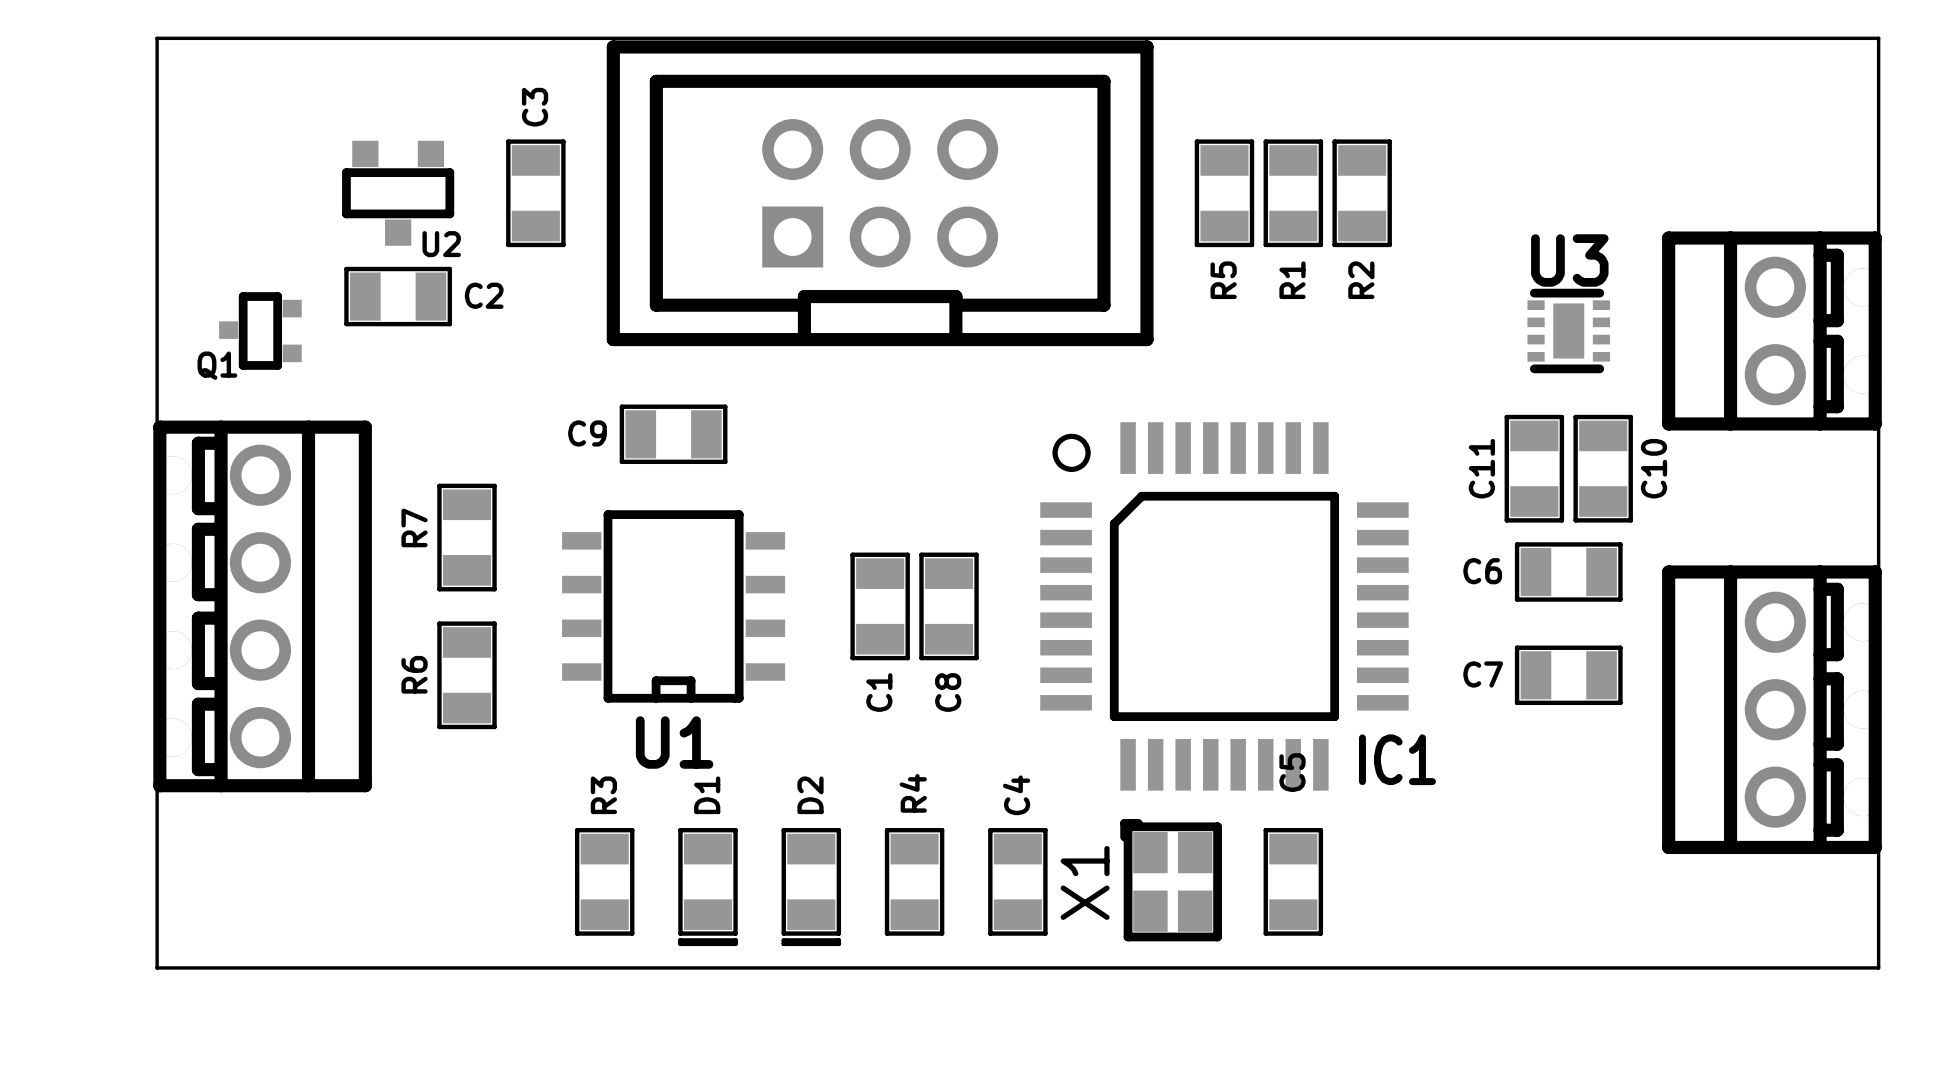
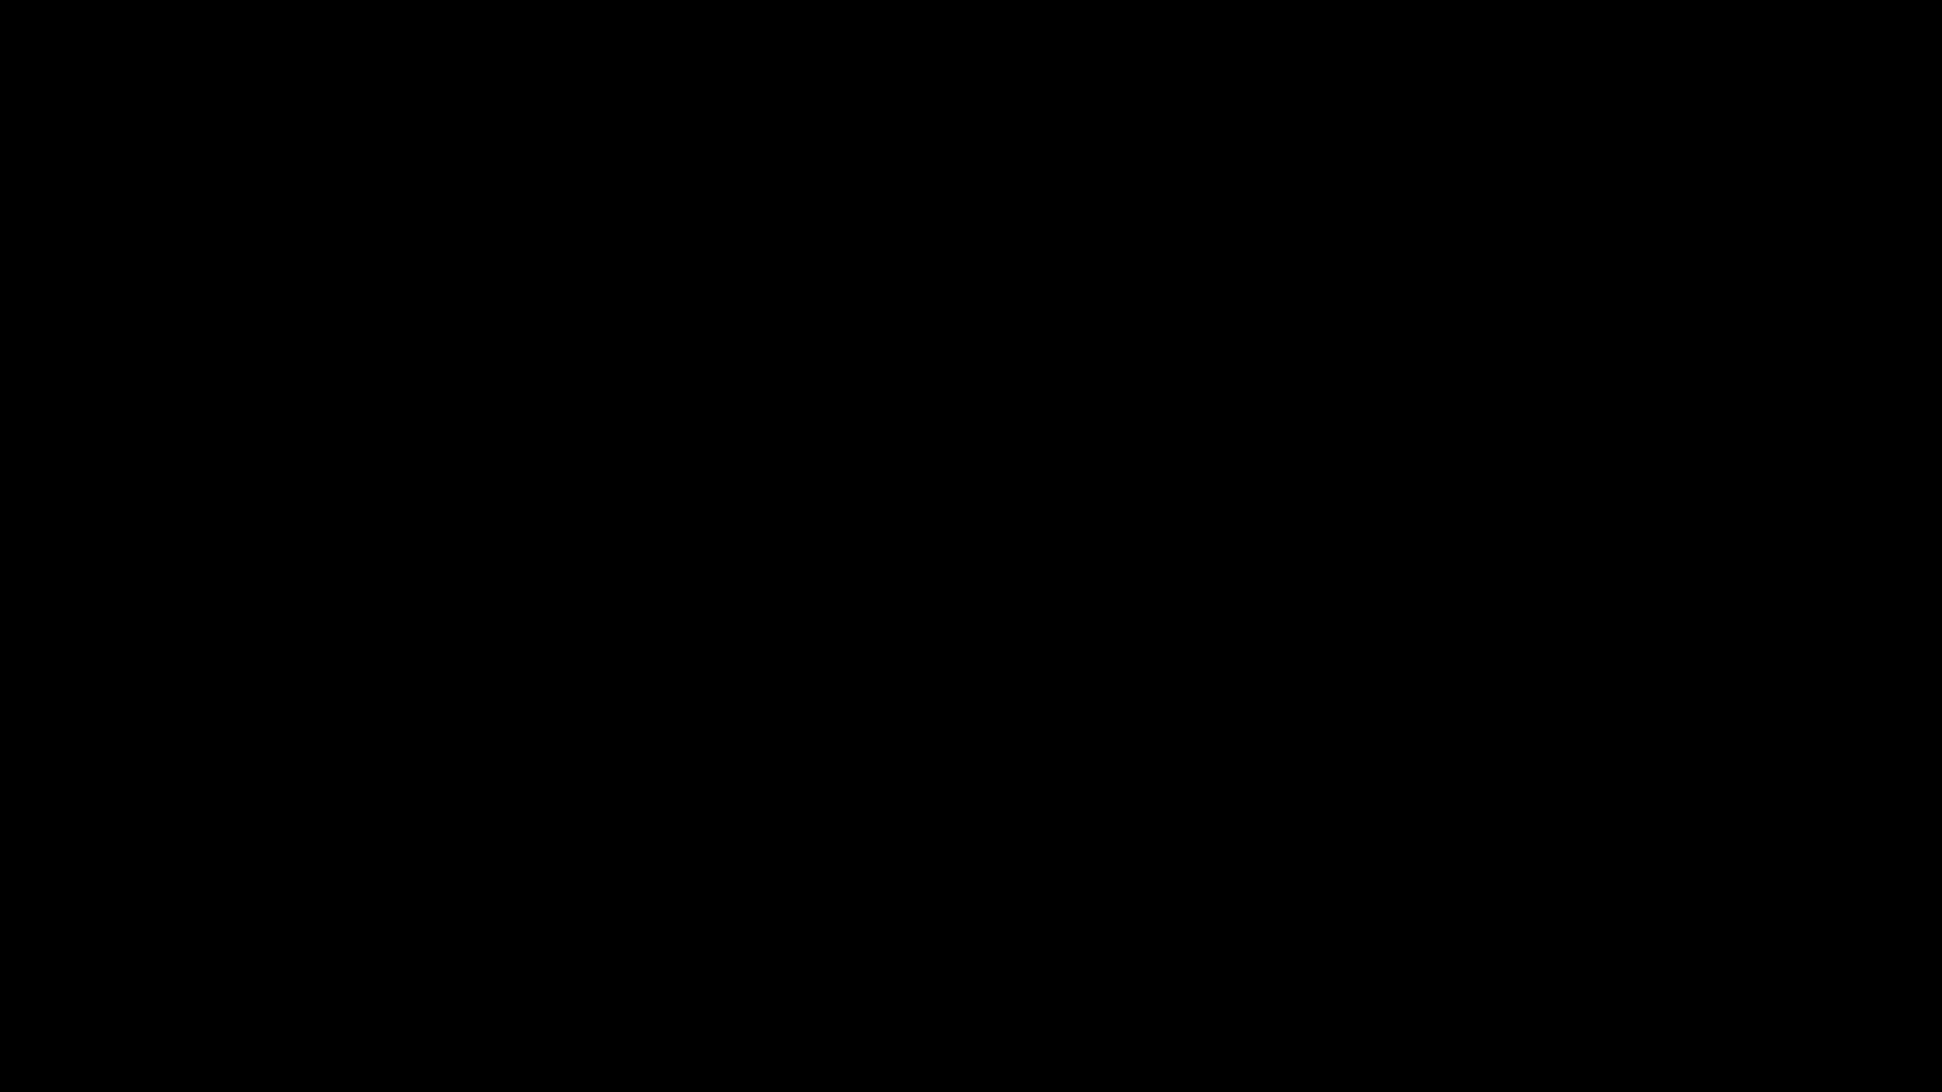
board edge: (157, 38) (1878, 38) (1878, 967) (157, 967) (157, 38) -> none
U2: (398, 193) -> none
C3: (535, 193) -> none
part: (880, 193) -> none
R5: (1224, 193) -> none
R1: (1293, 193) -> none
R2: (1362, 193) -> none
C2: (398, 296) -> none
Q1: (260, 330) -> none
U3: (1568, 330) -> none
part: (1771, 330) -> none
C9: (673, 434) -> none
C11: (1534, 468) -> none
C10: (1603, 468) -> none
R7: (466, 537) -> none
C6: (1568, 572) -> none
part: (262, 606) -> none
U1: (673, 606) -> none
C1: (880, 606) -> none
C8: (949, 606) -> none
IC1: (1224, 606) -> none
R6: (466, 675) -> none
C7: (1568, 675) -> none
part: (1771, 709) -> none
X1: (1171, 880) -> none
R3: (604, 881) -> none
R4: (914, 881) -> none
C4: (1017, 881) -> none
C5: (1293, 881) -> none
D1: (708, 887) -> none
D2: (811, 887) -> none

